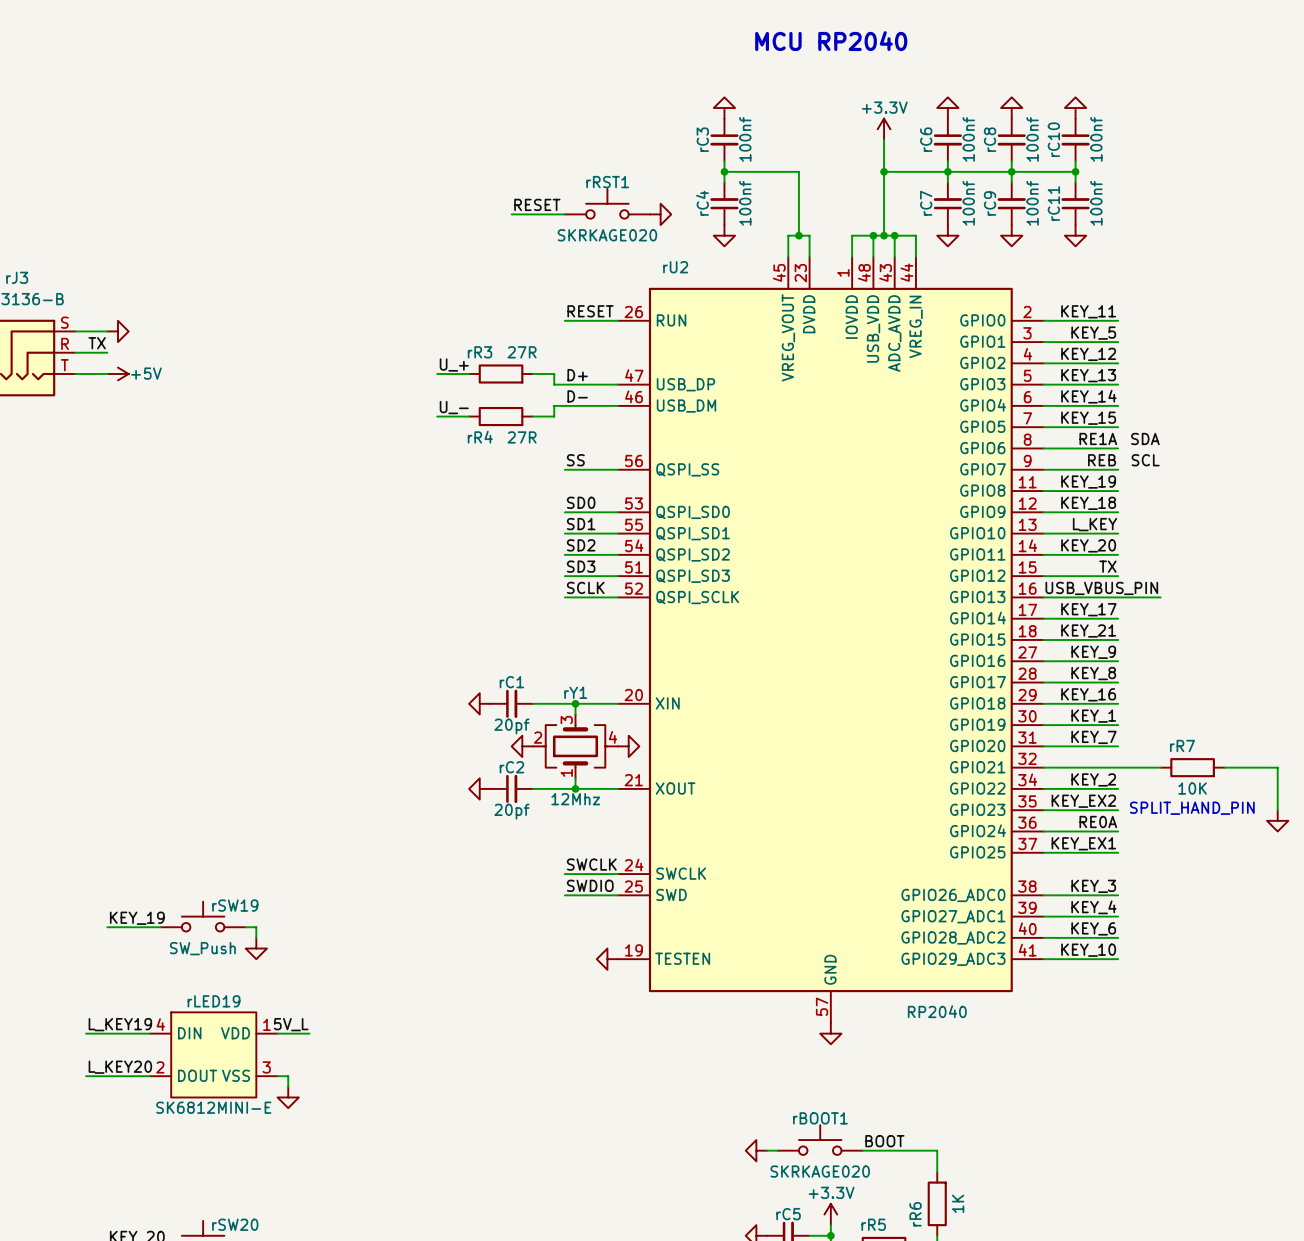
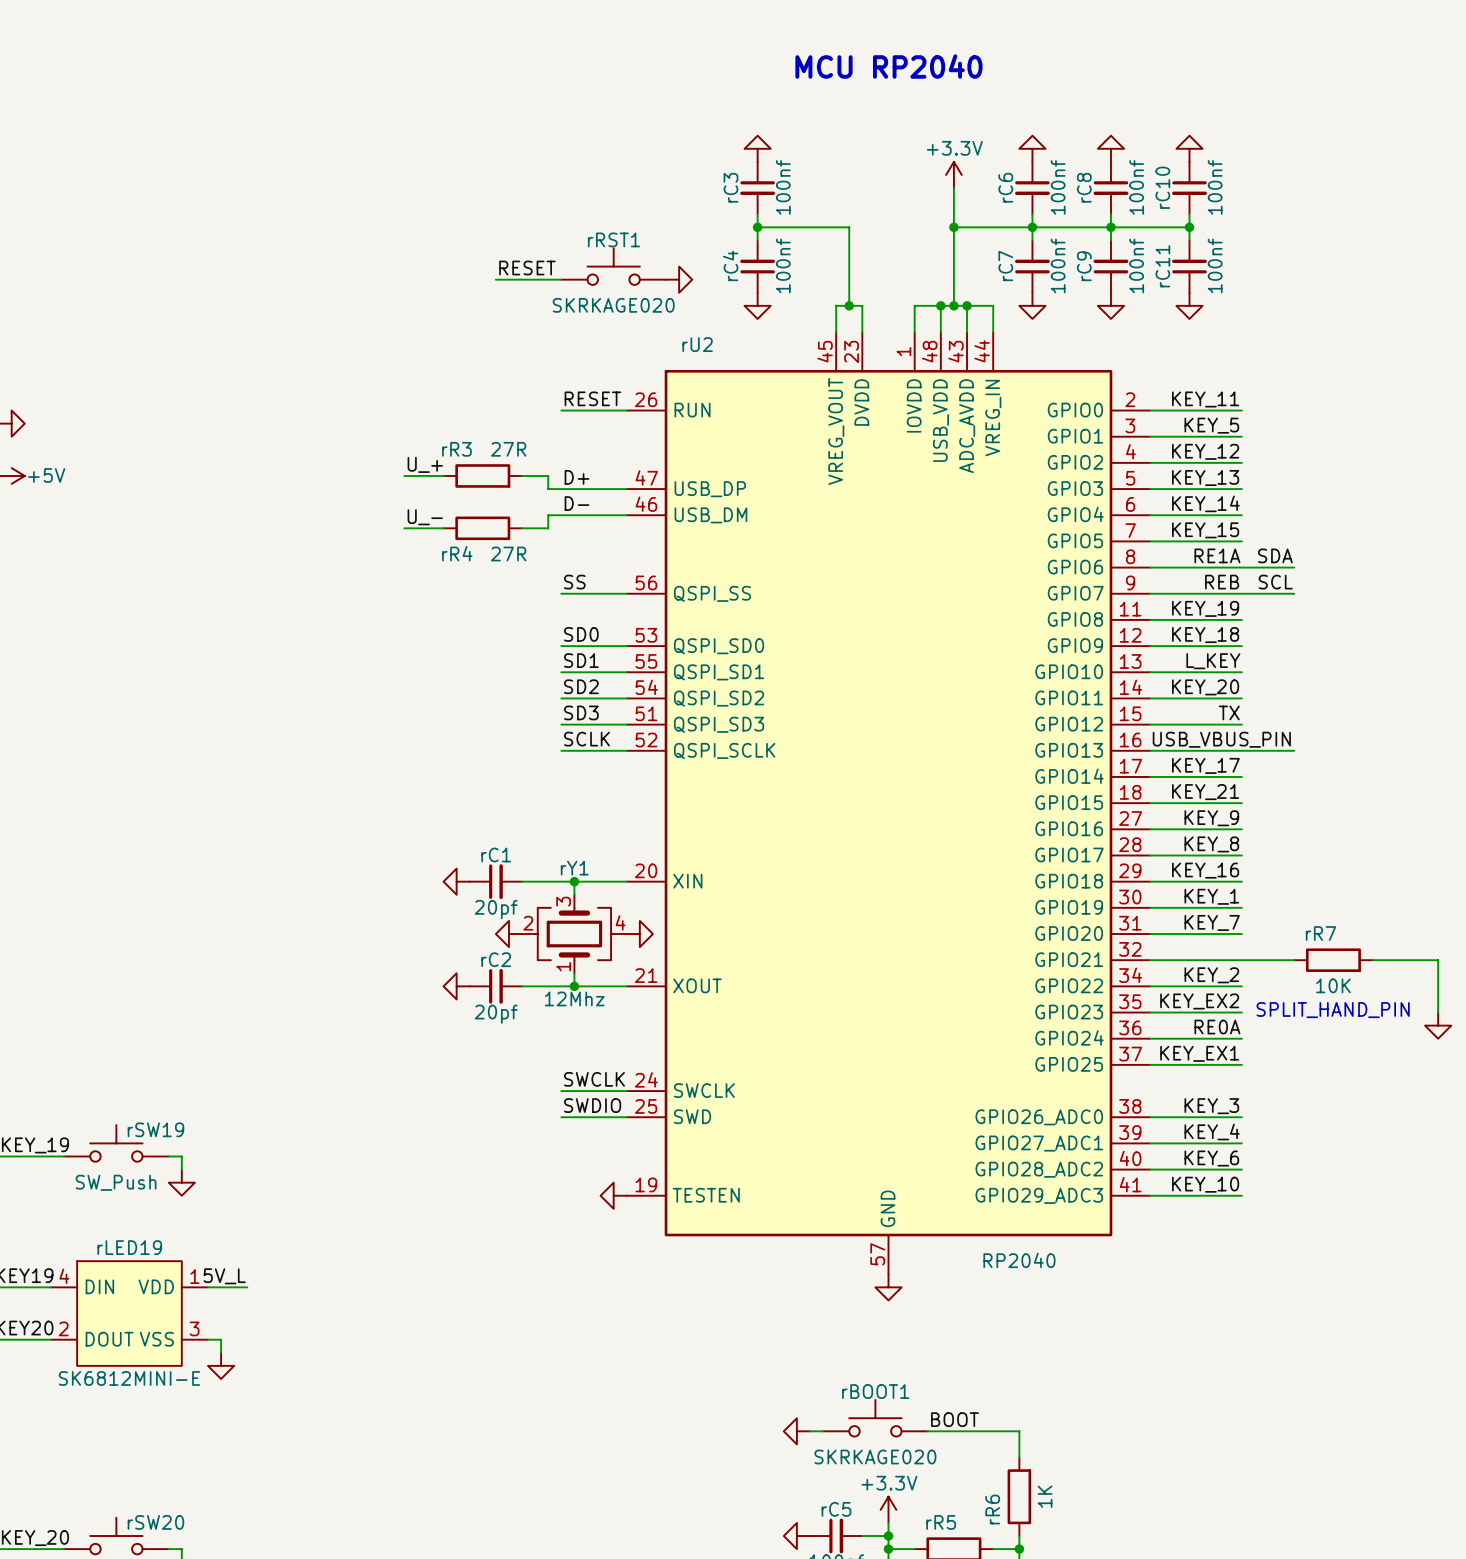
wire: none -> (1241, 567) (1294, 567)
wire: none -> (1241, 593) (1294, 593)

